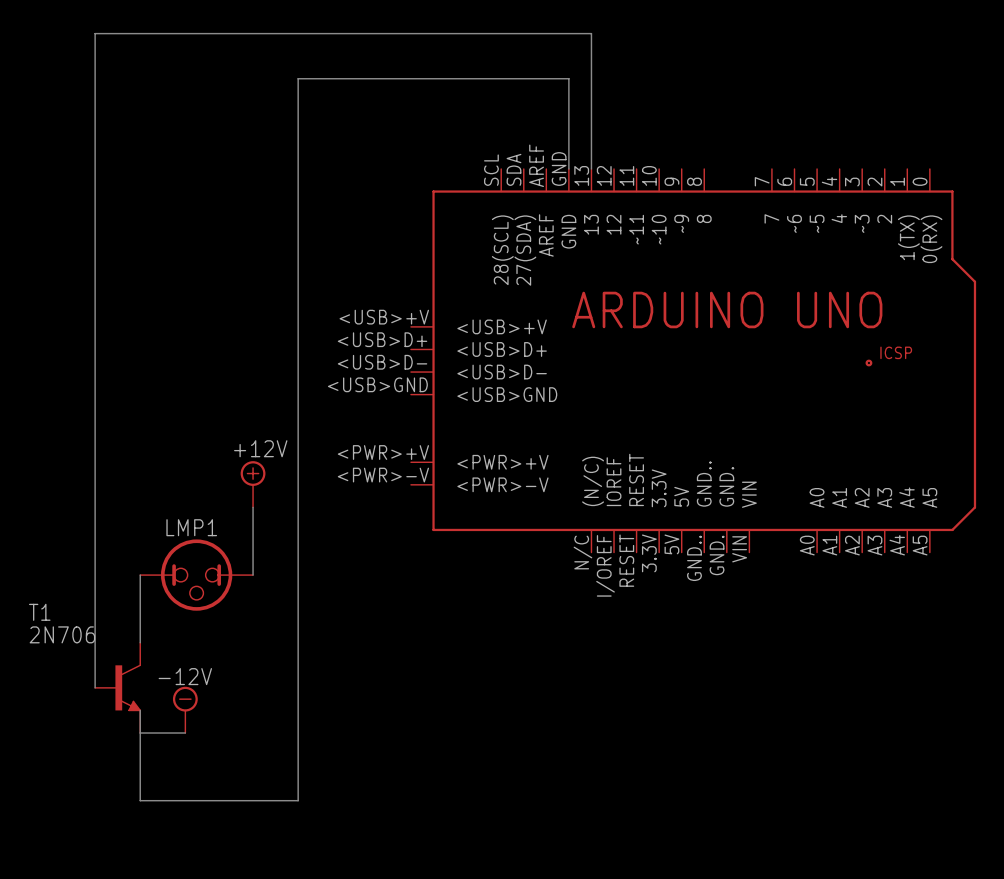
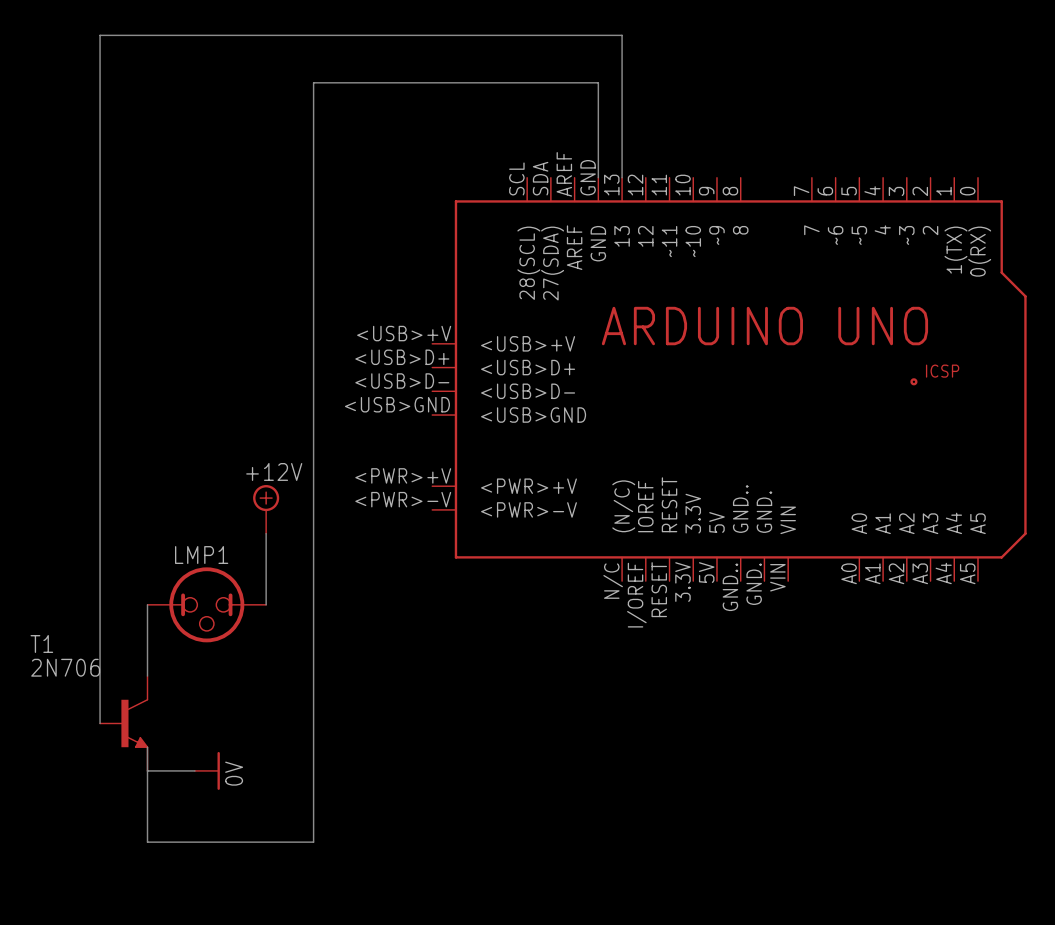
power symbol: -12V (185, 709) -> none
power symbol: none -> 0V (207, 770)

